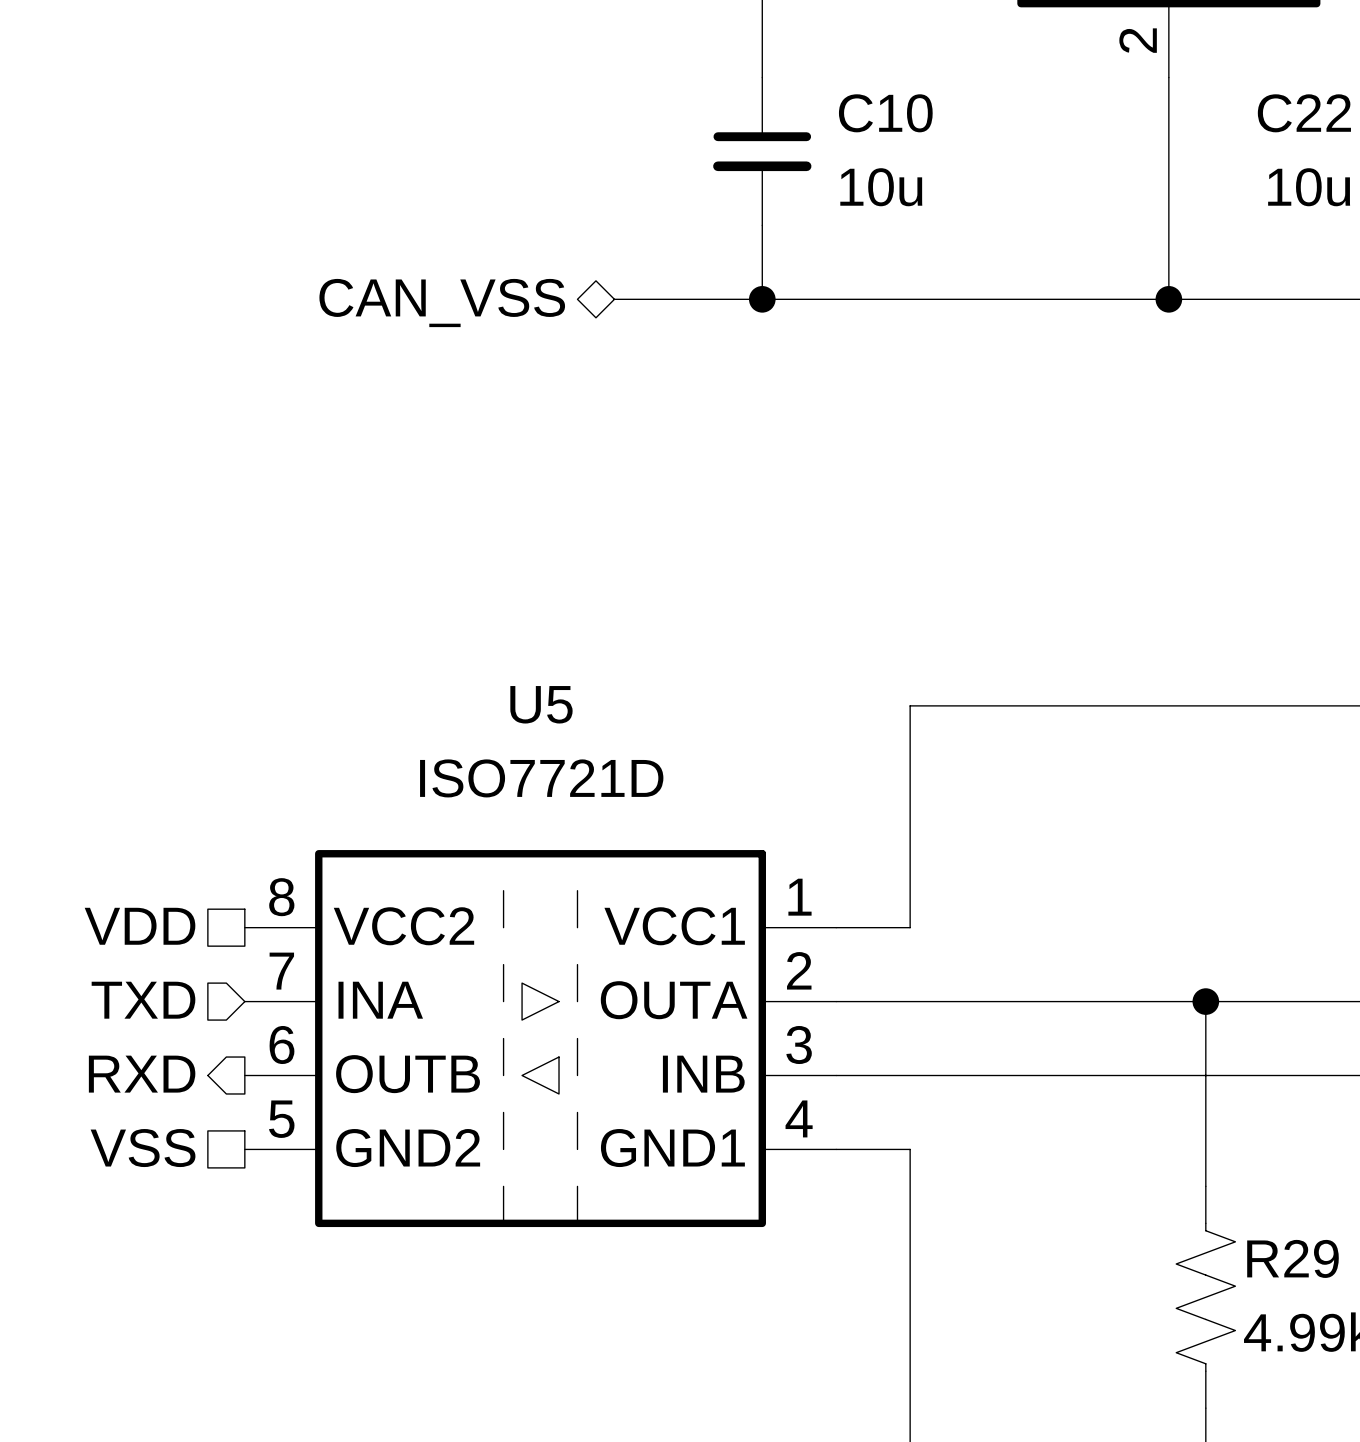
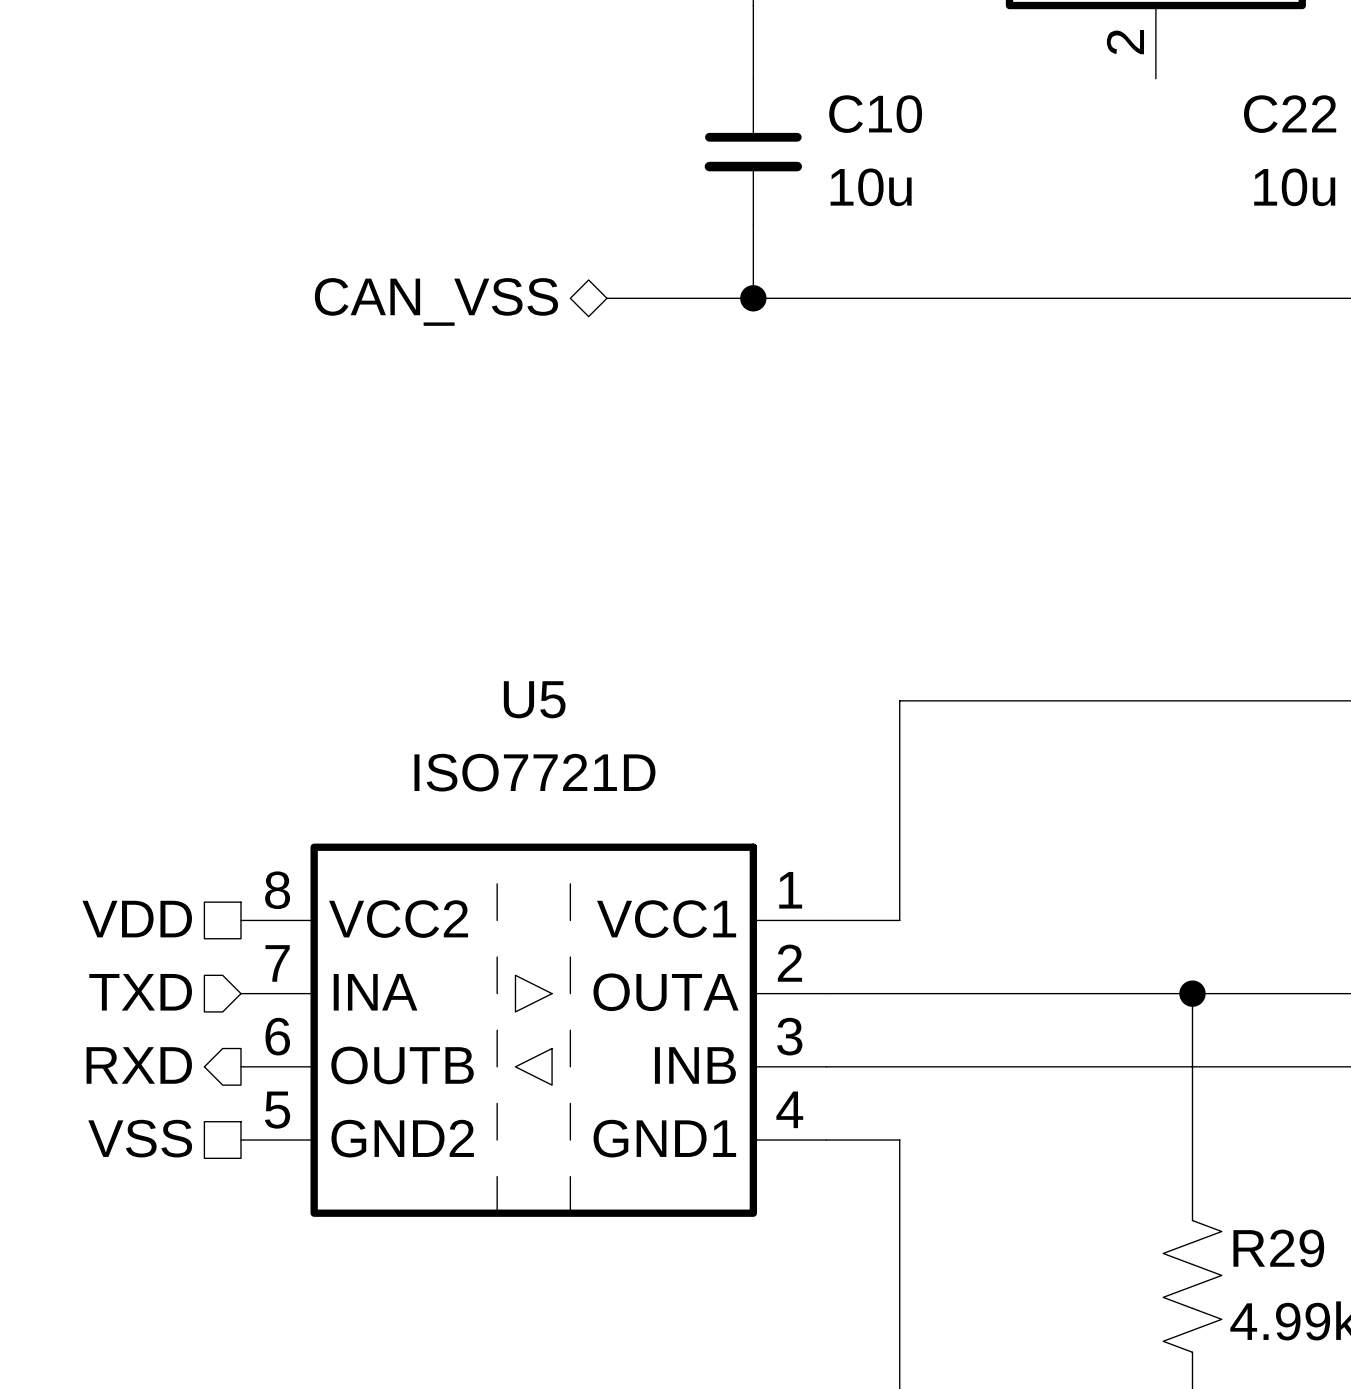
wire: (1168, 77) (1168, 299) -> none
junction: (1168, 299) -> none

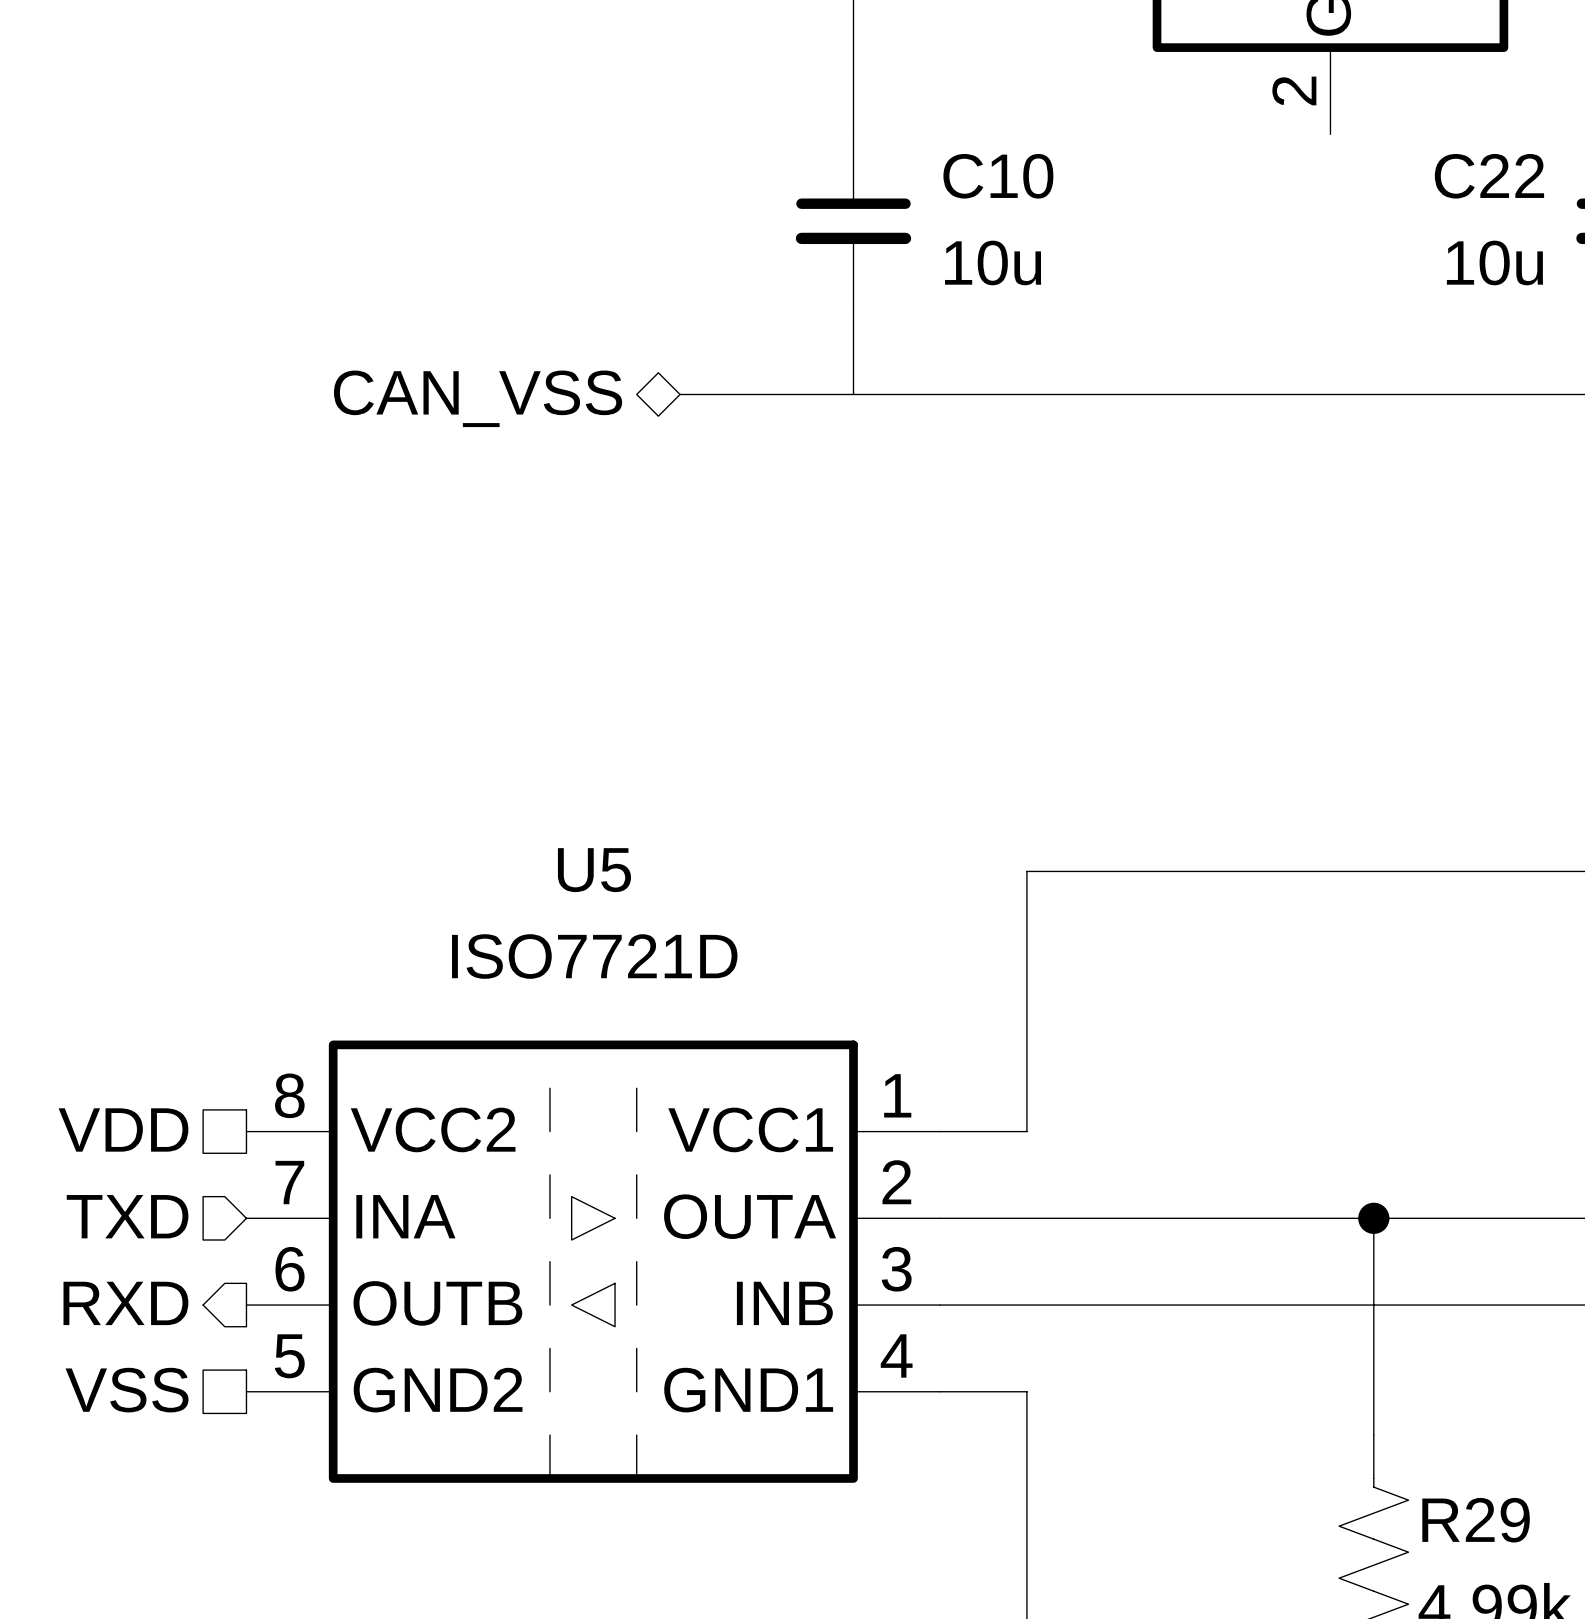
junction: (753, 298) -> none

